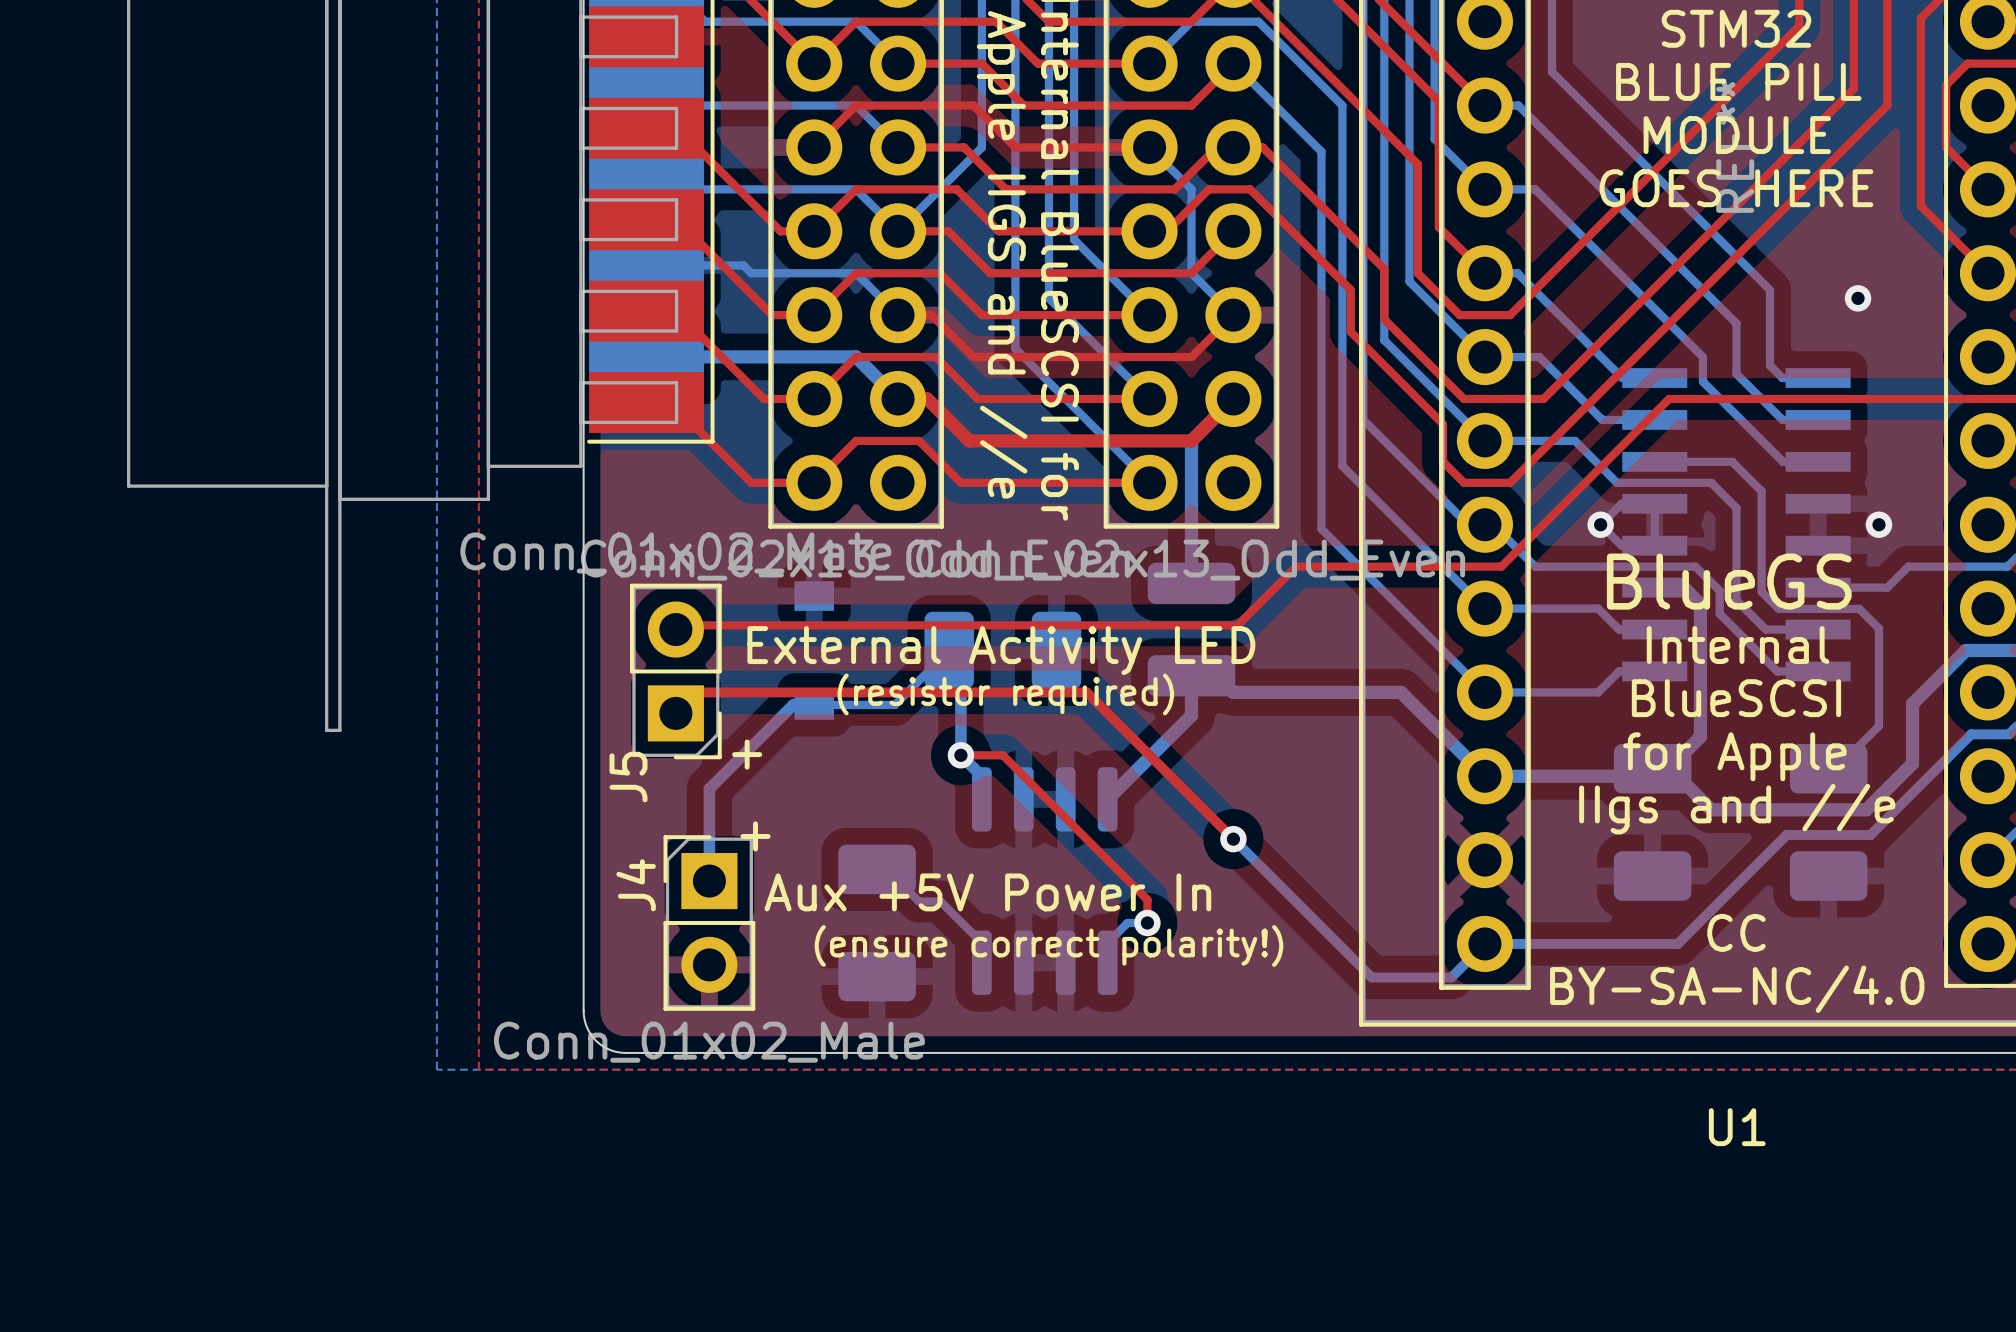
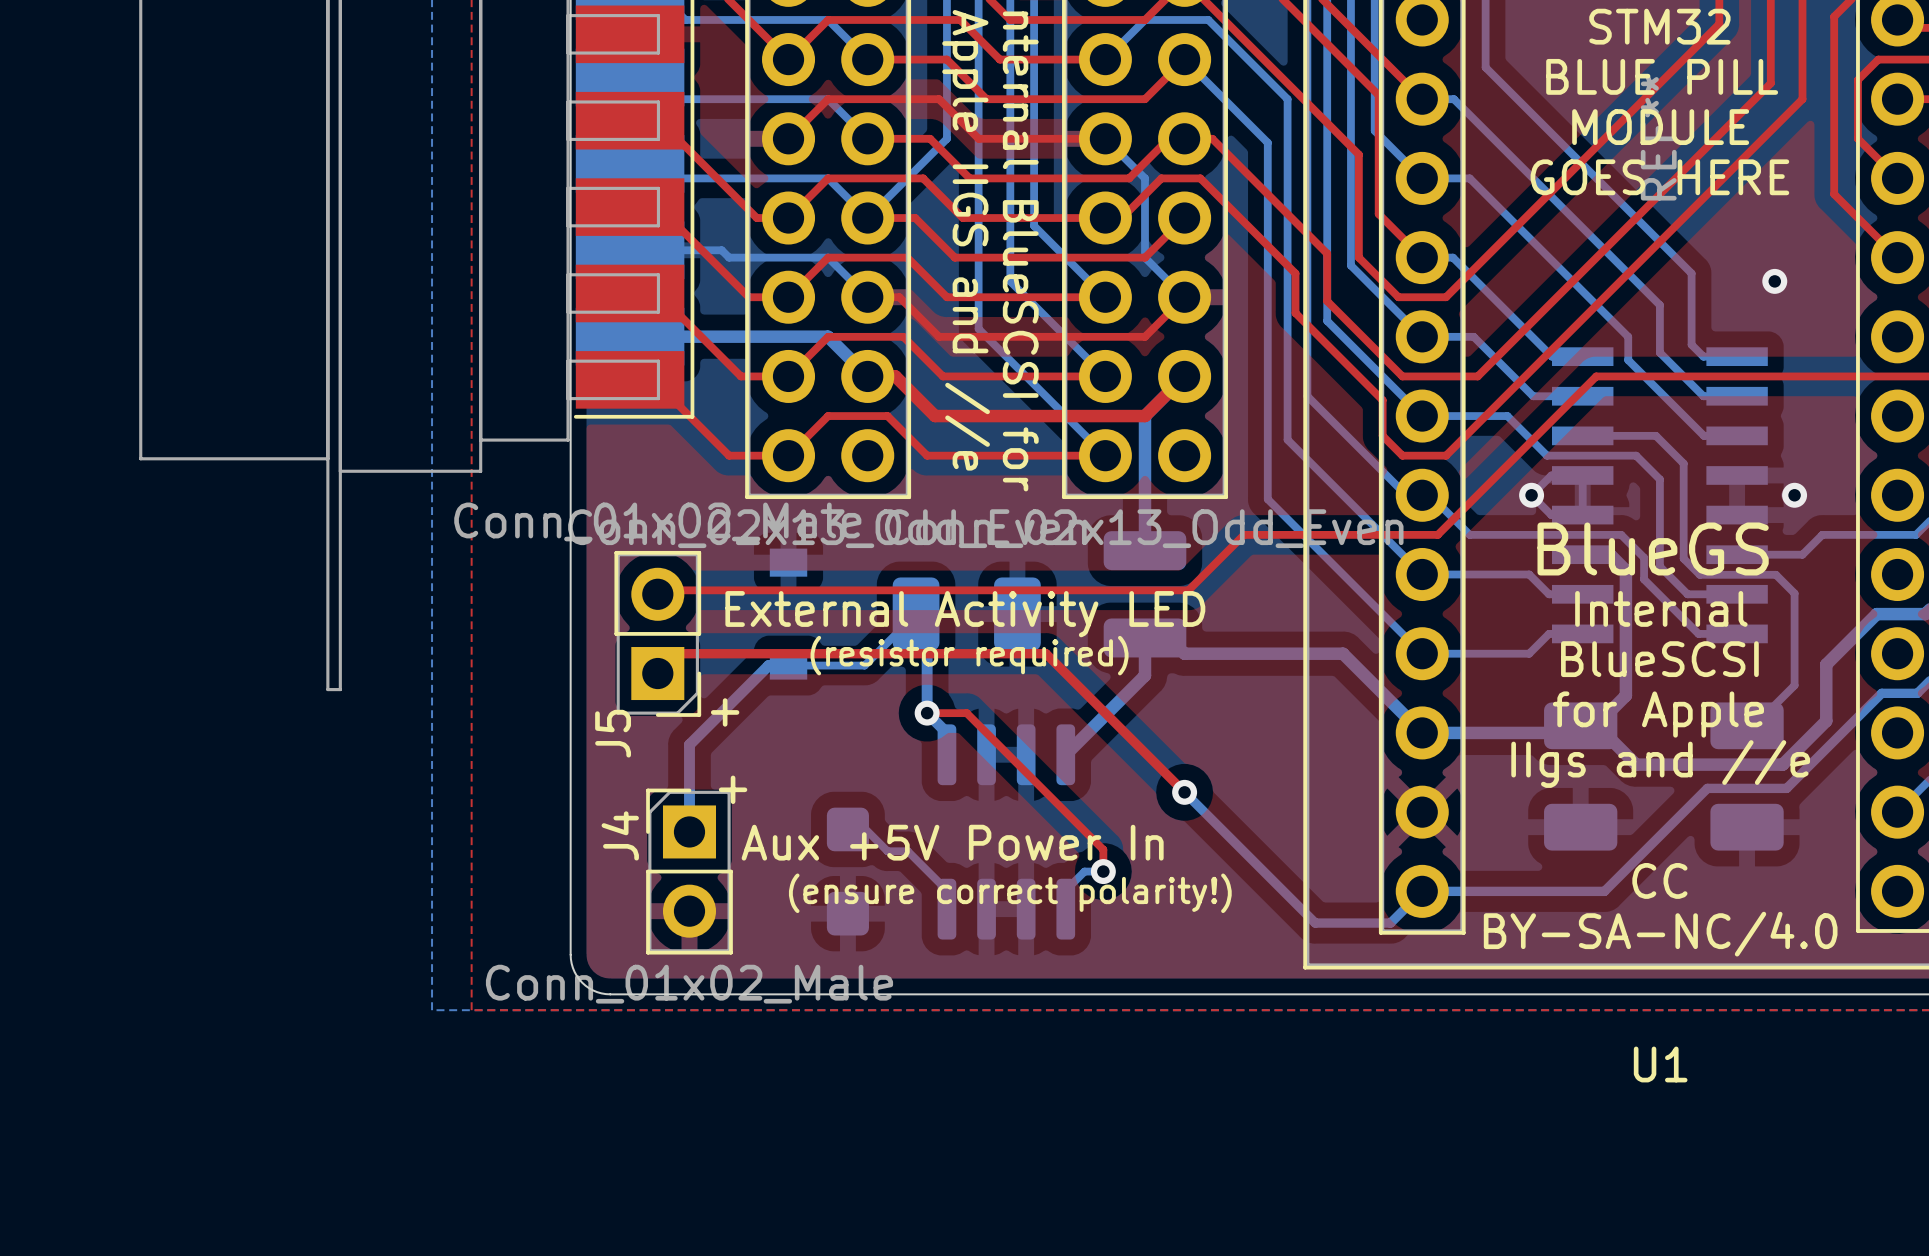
part footprint: [838, 844, 916, 1002] -> [826, 807, 869, 936]

